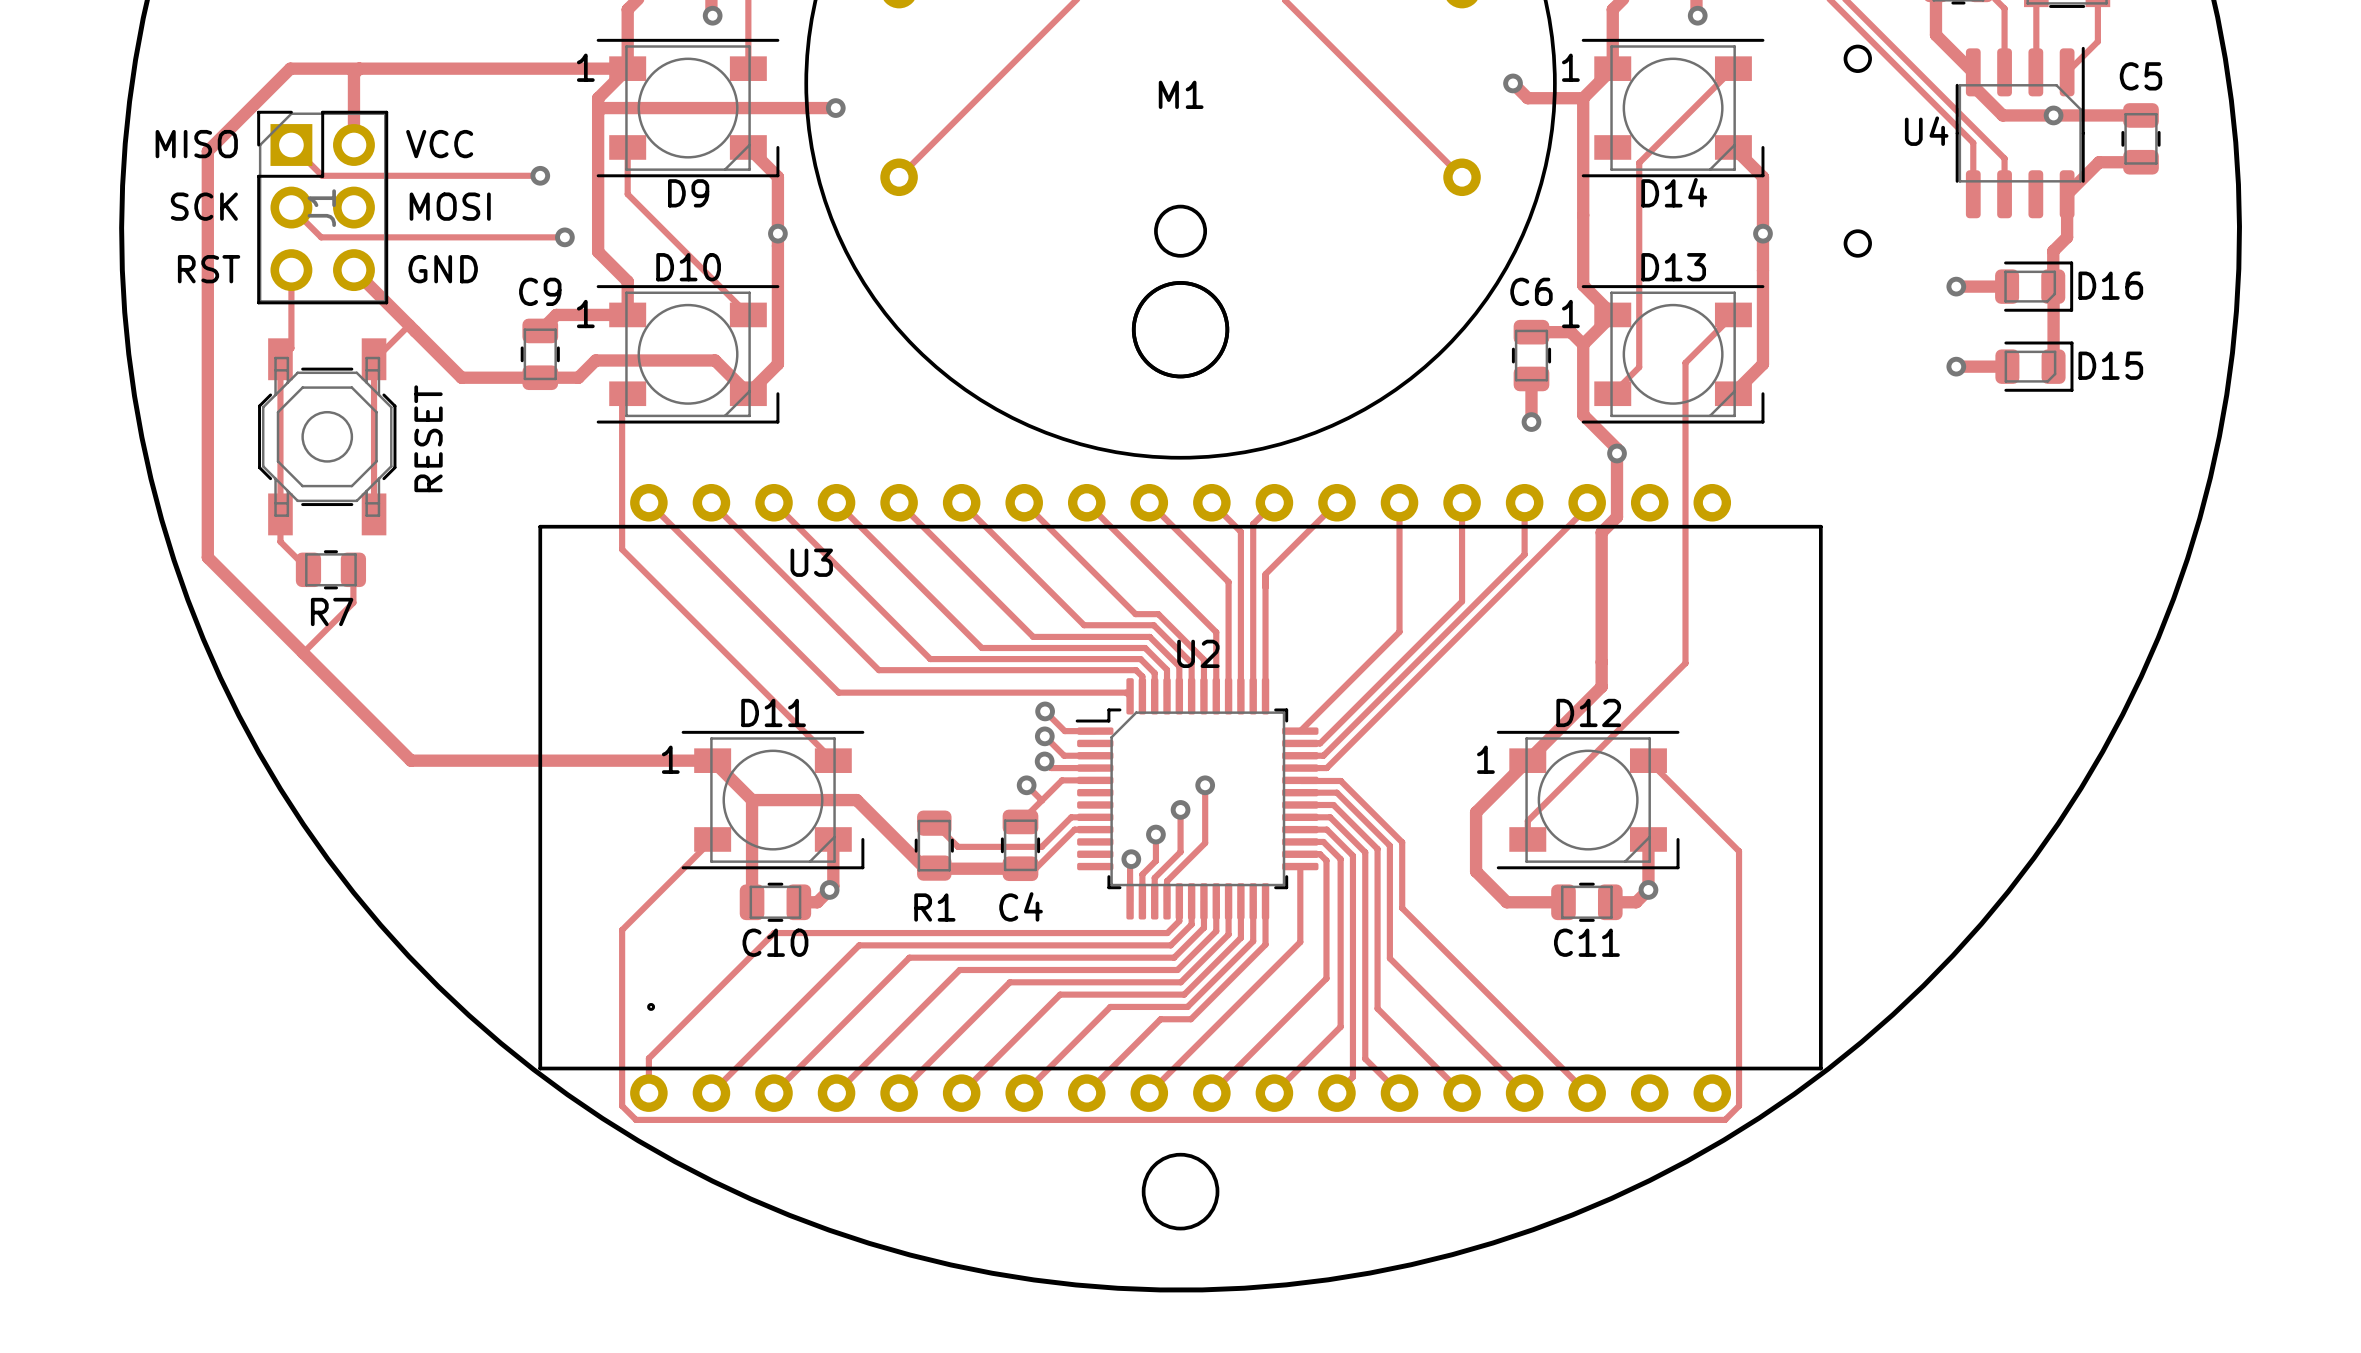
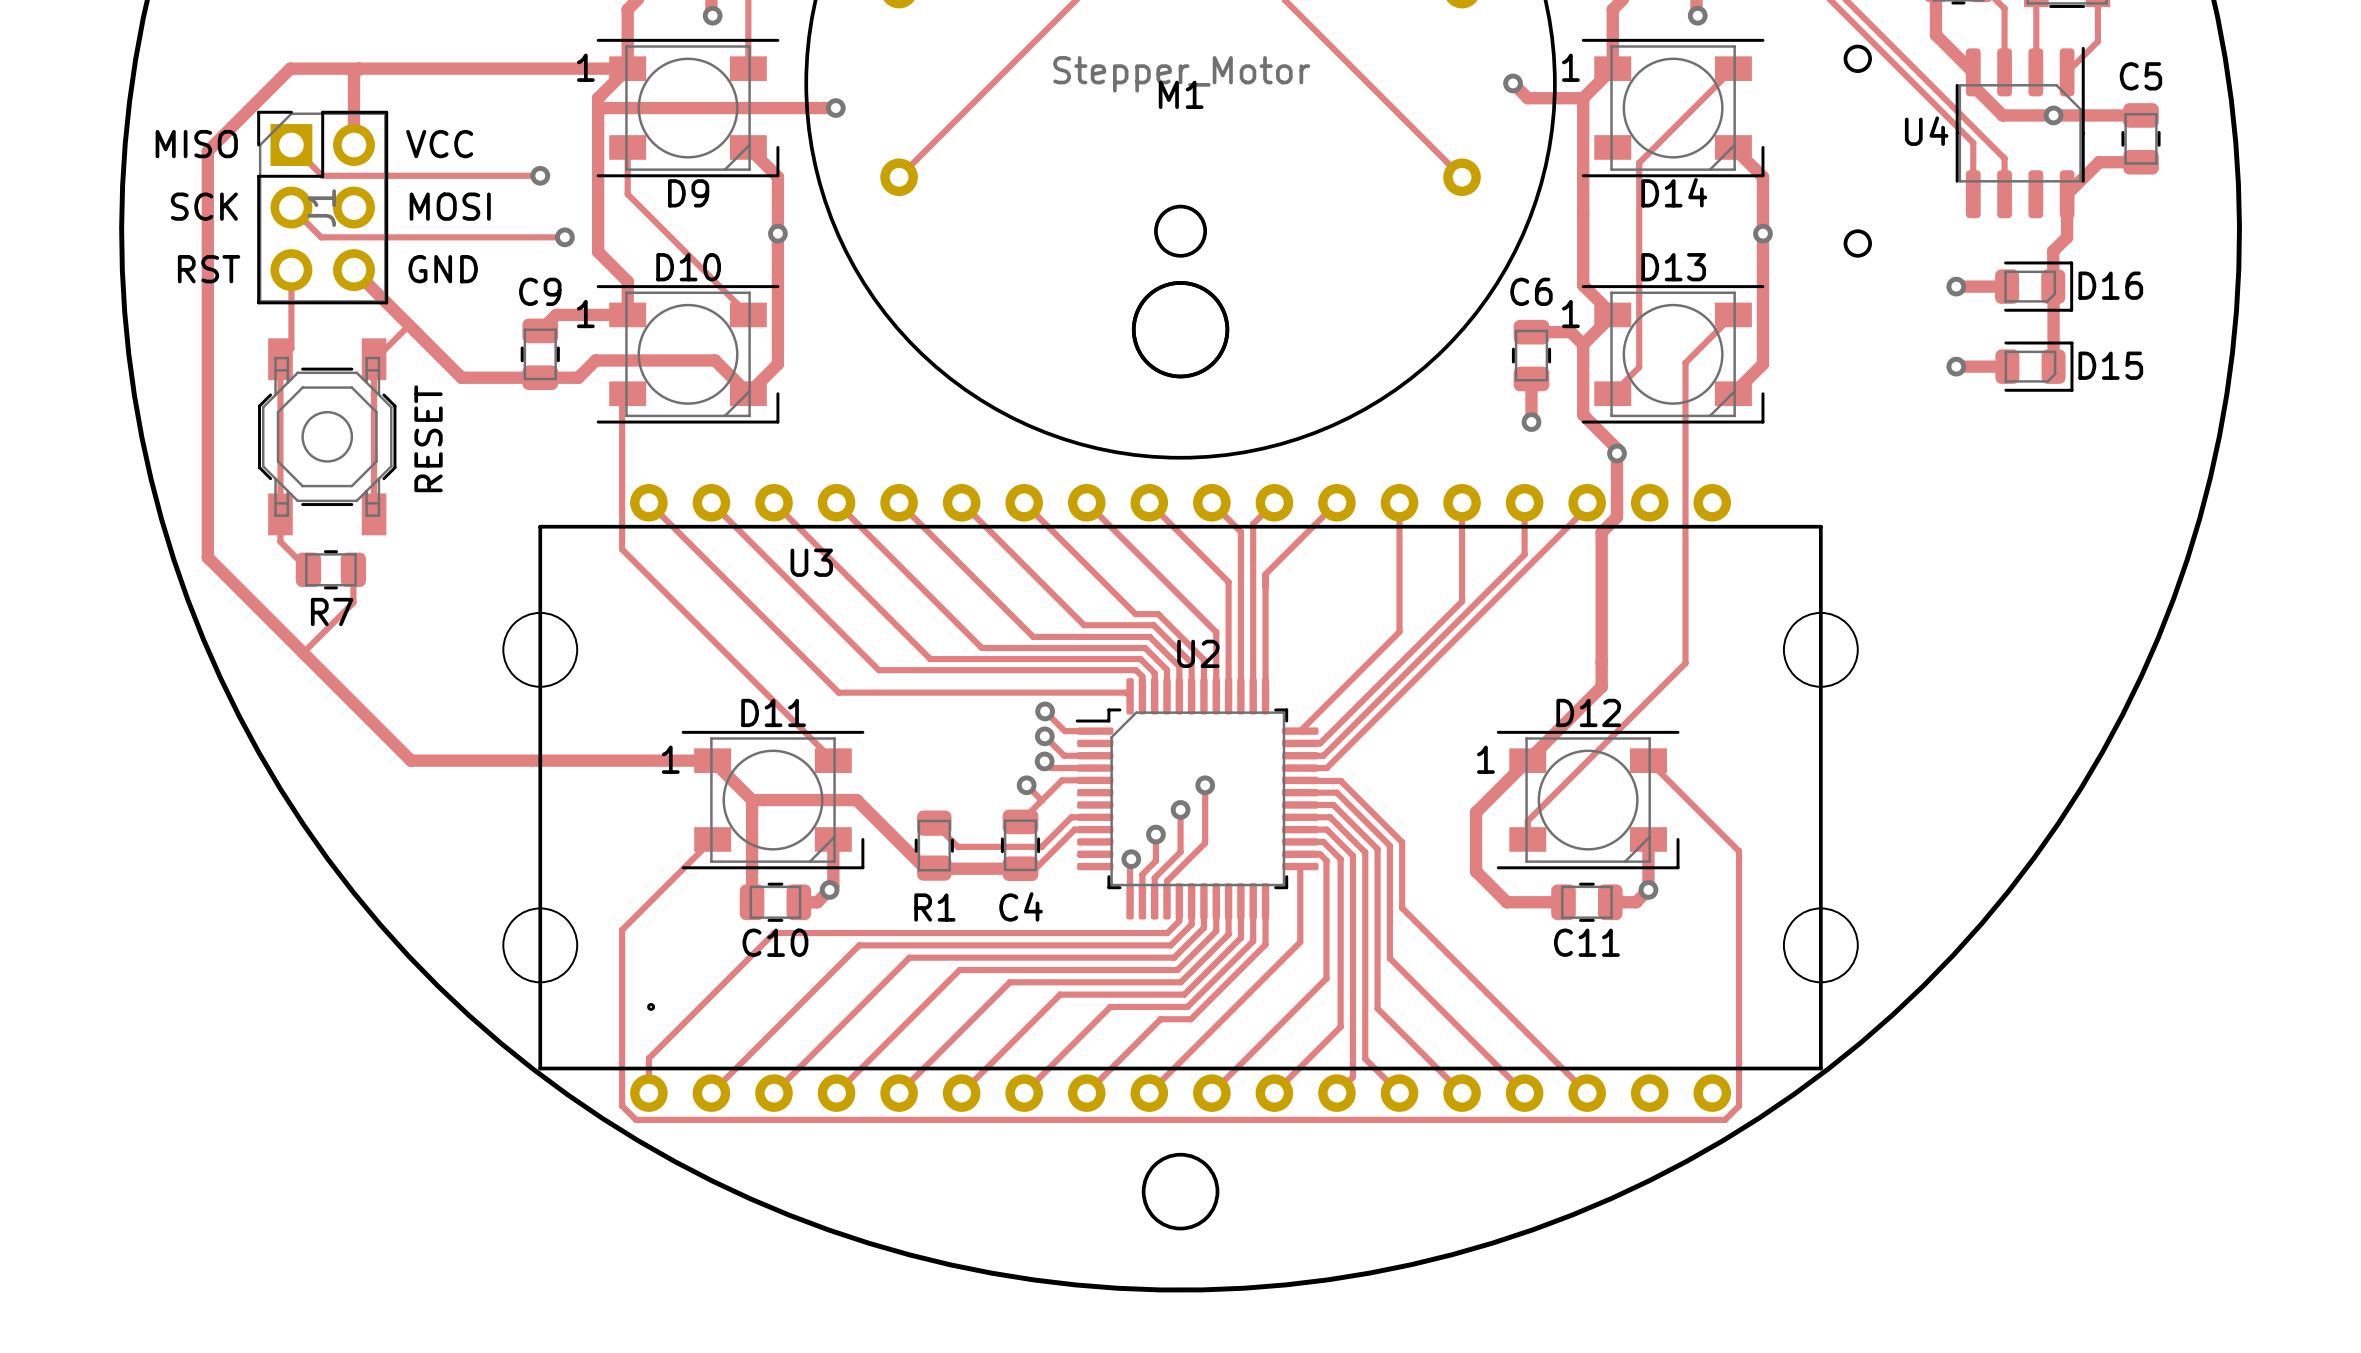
M1 value: none -> Stepper_Motor (1181, 74)
round board edge: none -> [502, 612, 578, 688]
round board edge: none -> [1783, 612, 1859, 688]
round board edge: none -> [502, 907, 578, 983]
round board edge: none -> [1783, 907, 1859, 983]

